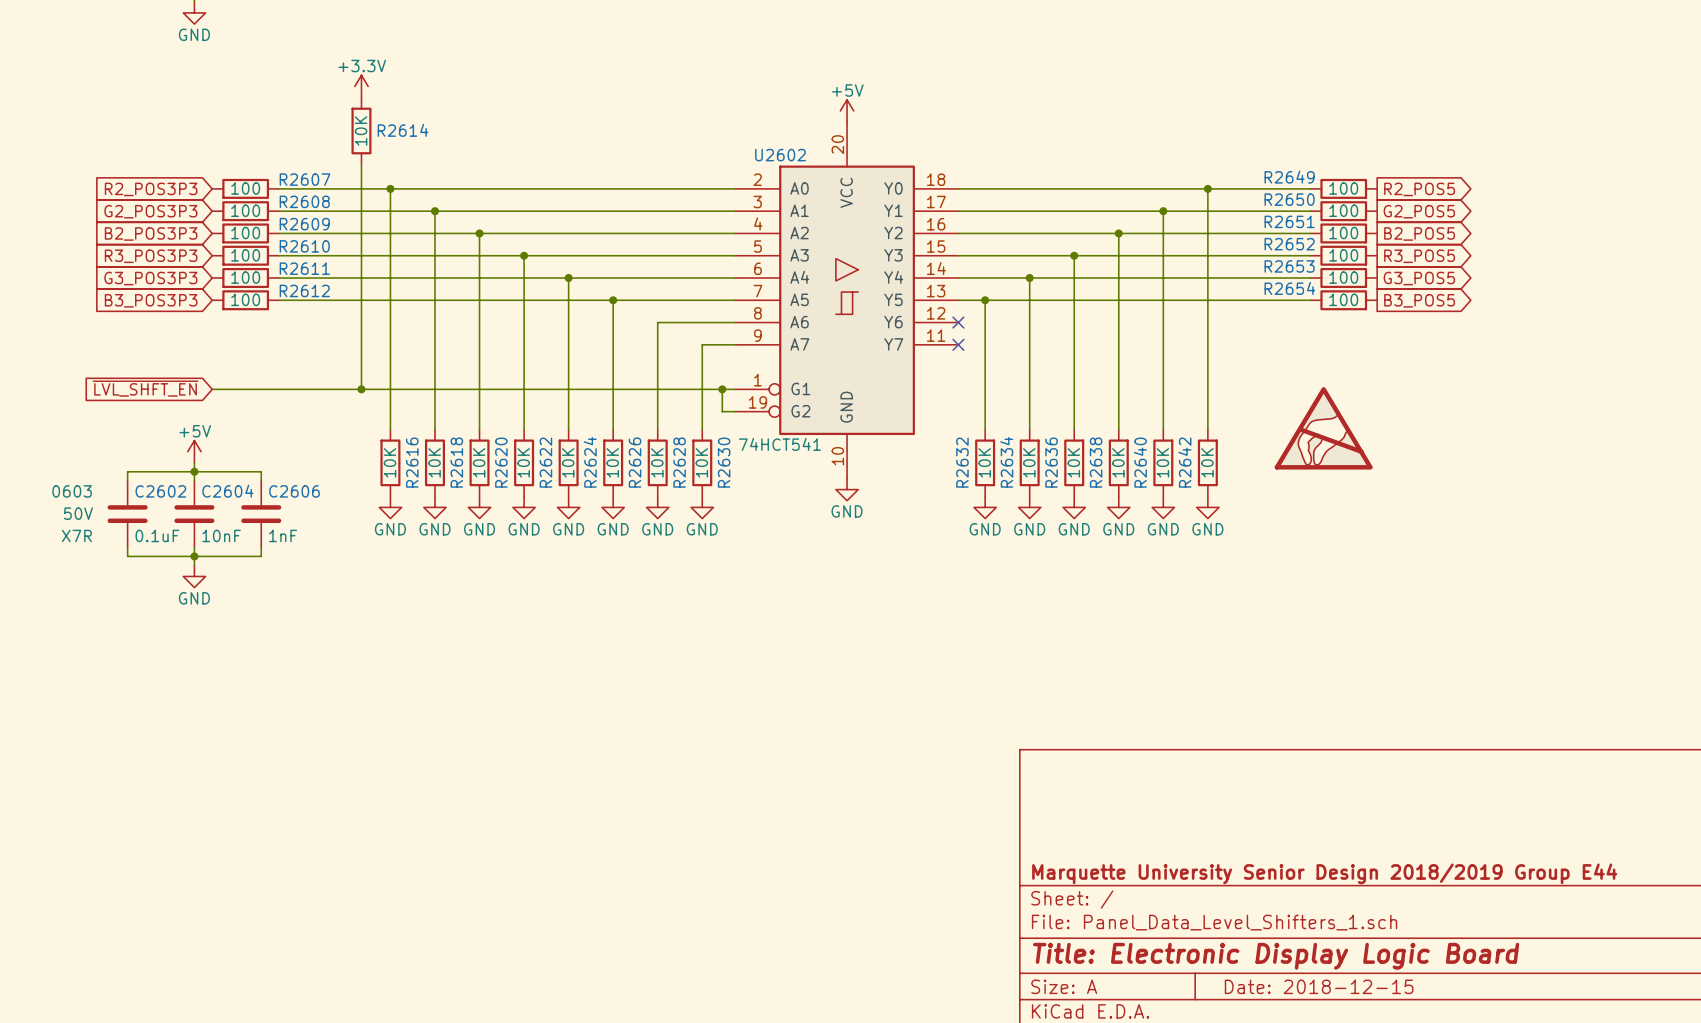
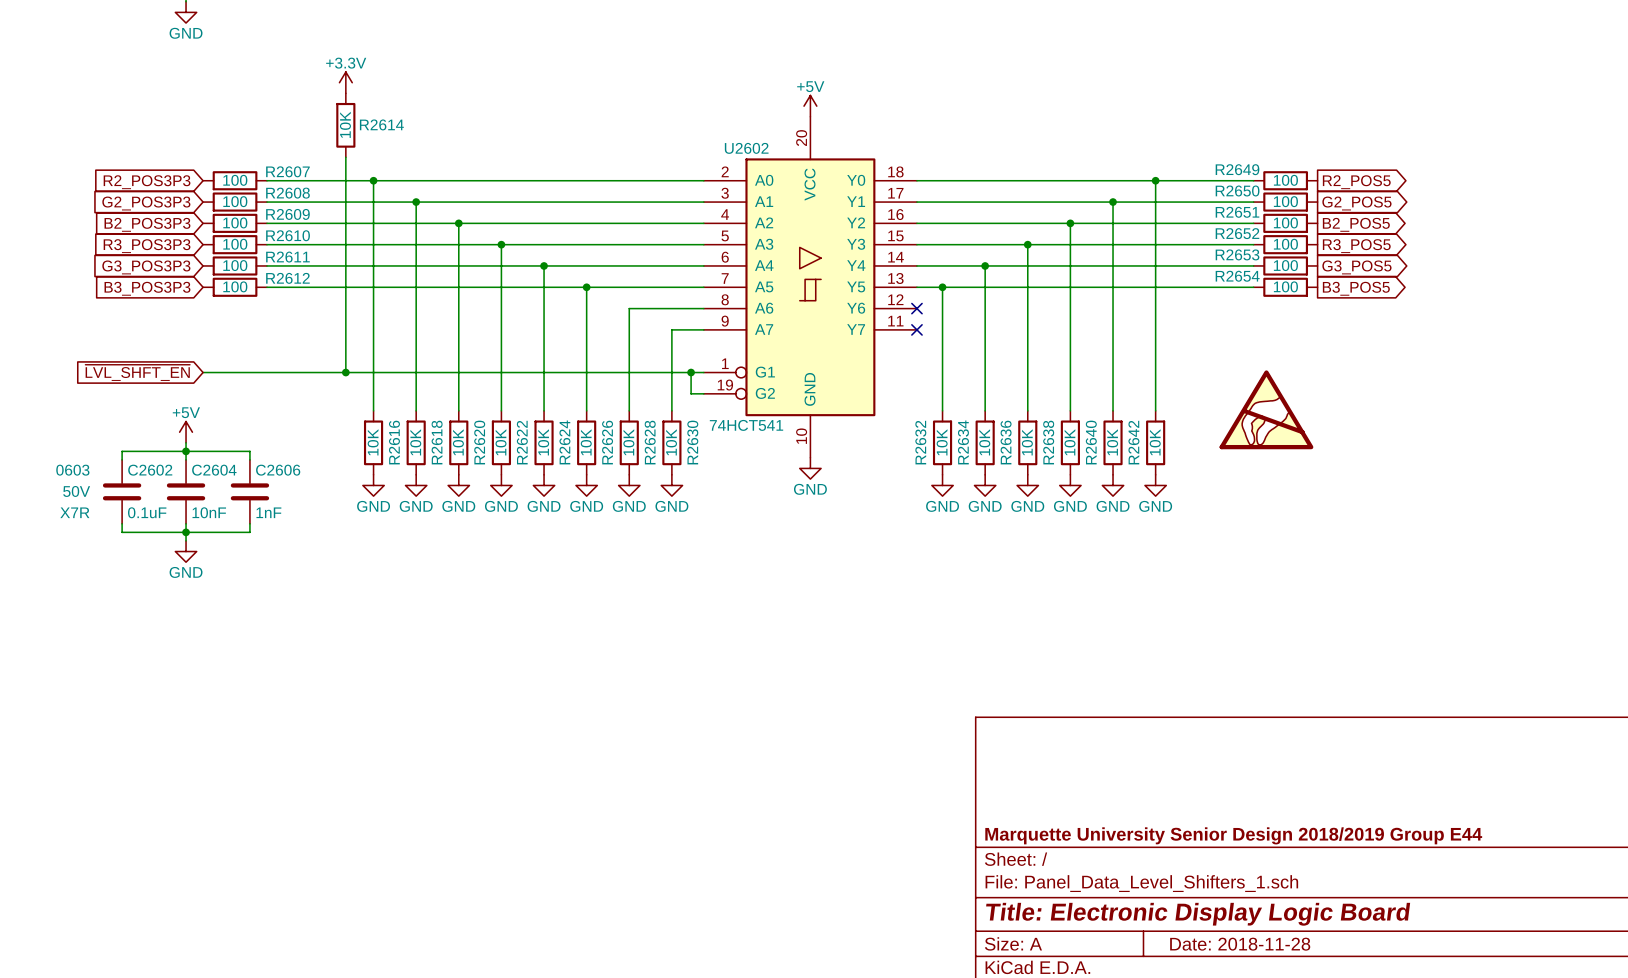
title block: Date: 2018-12-15 (1319, 986) -> Date: 2018-11-28 (1240, 944)

